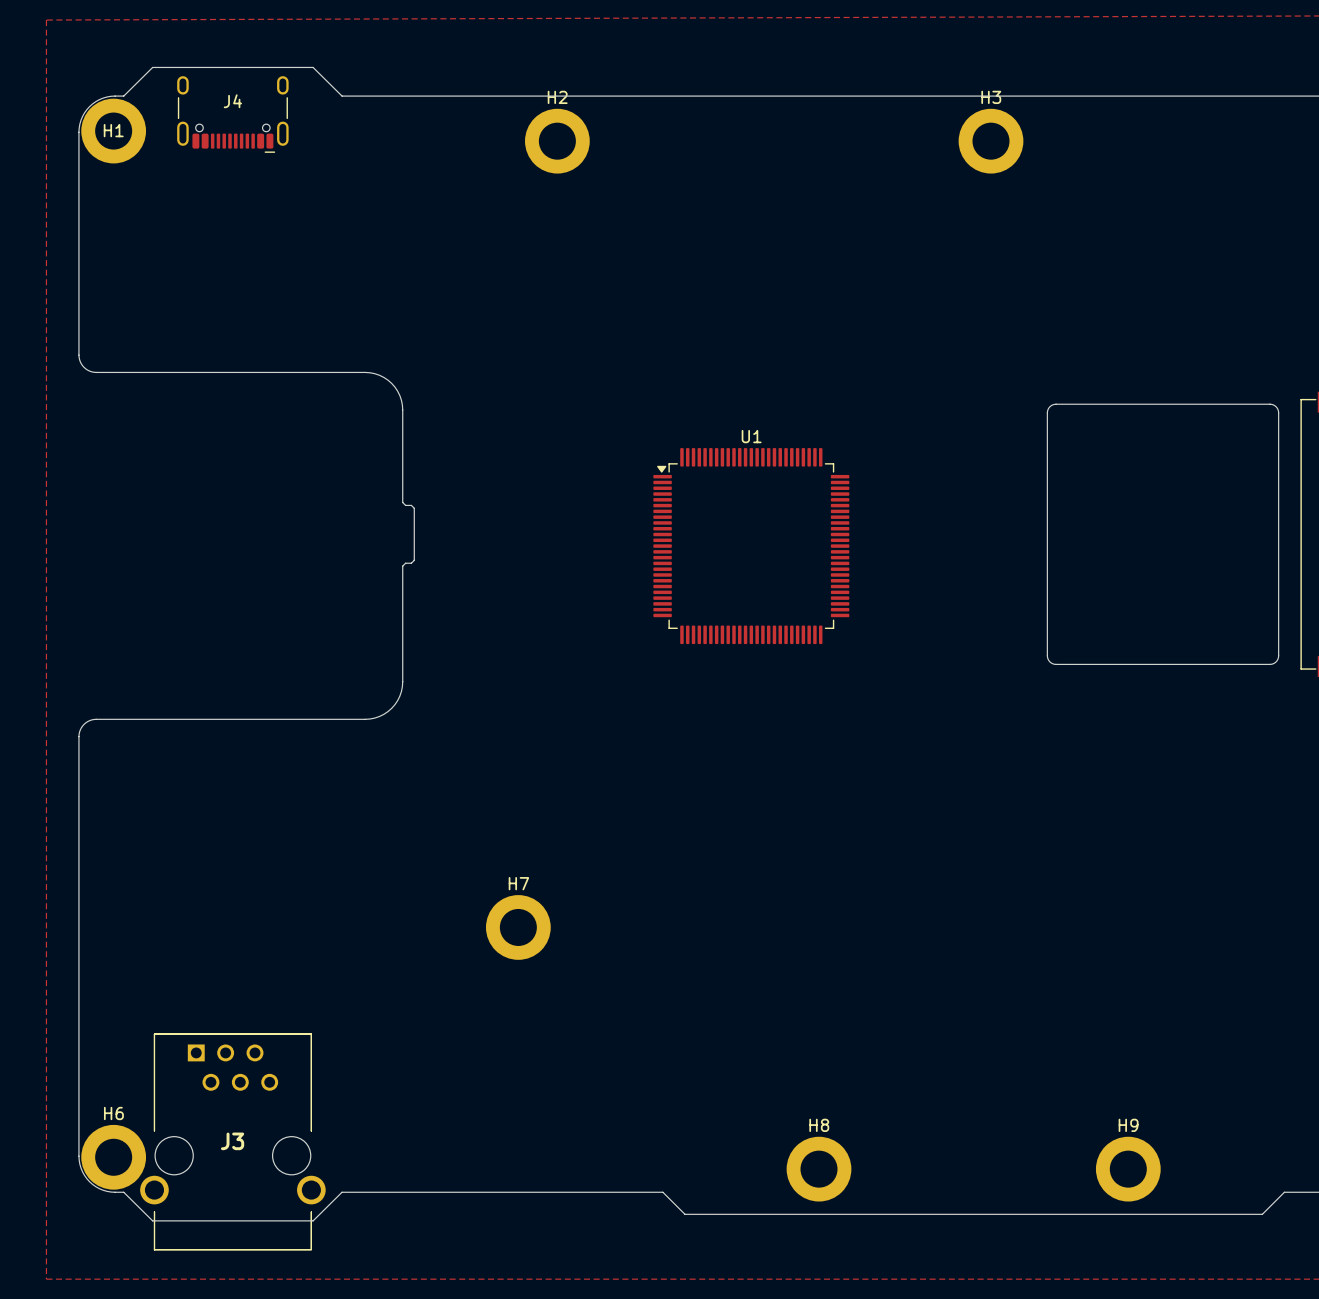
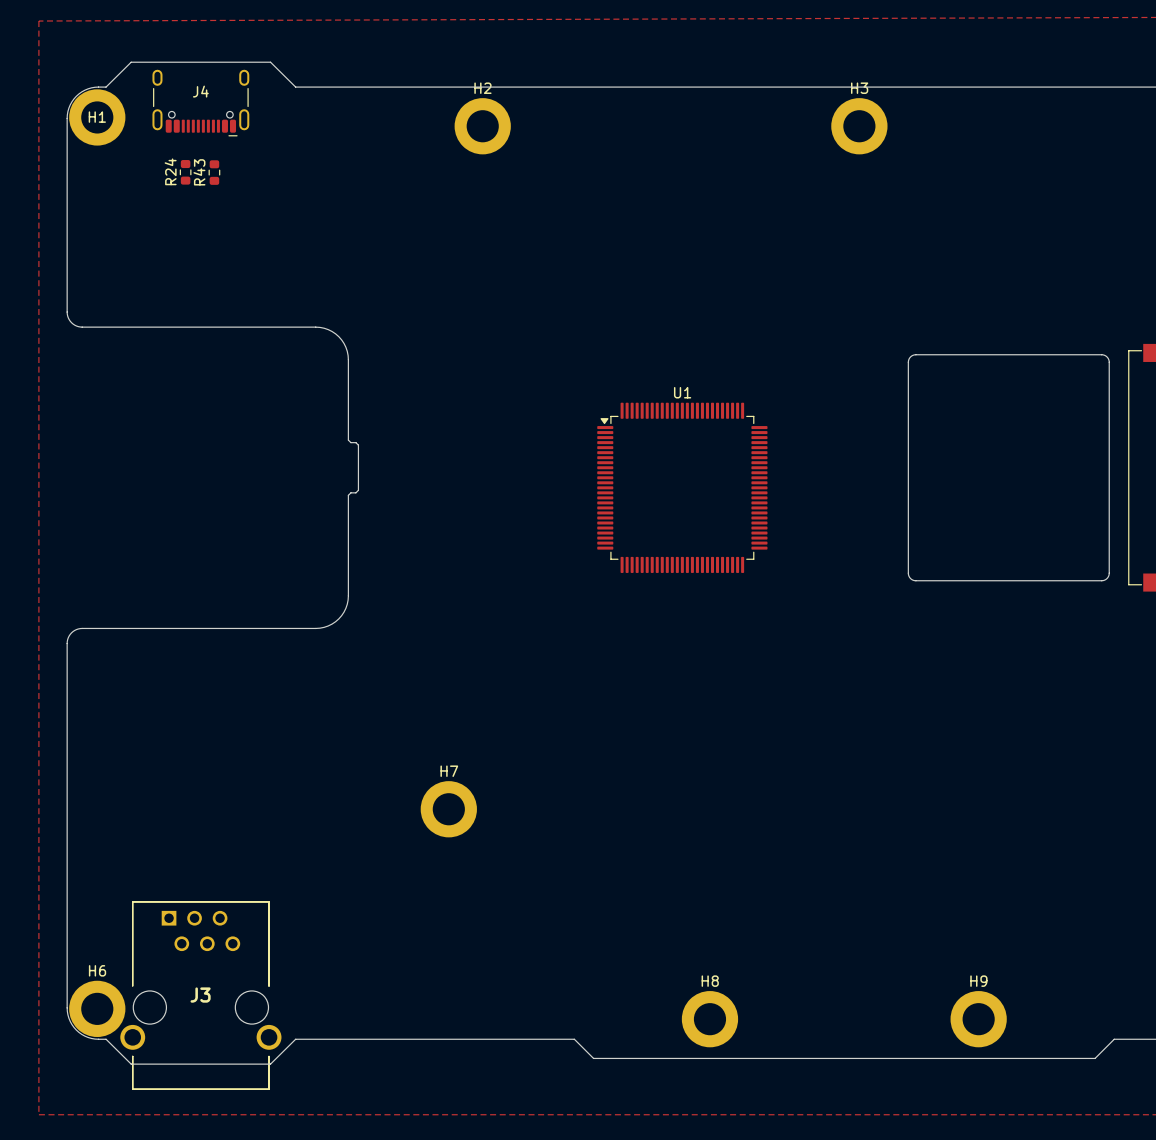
R24: none -> (185, 172)
R43: none -> (214, 172)
U1 position: (751, 546) -> (682, 487)

